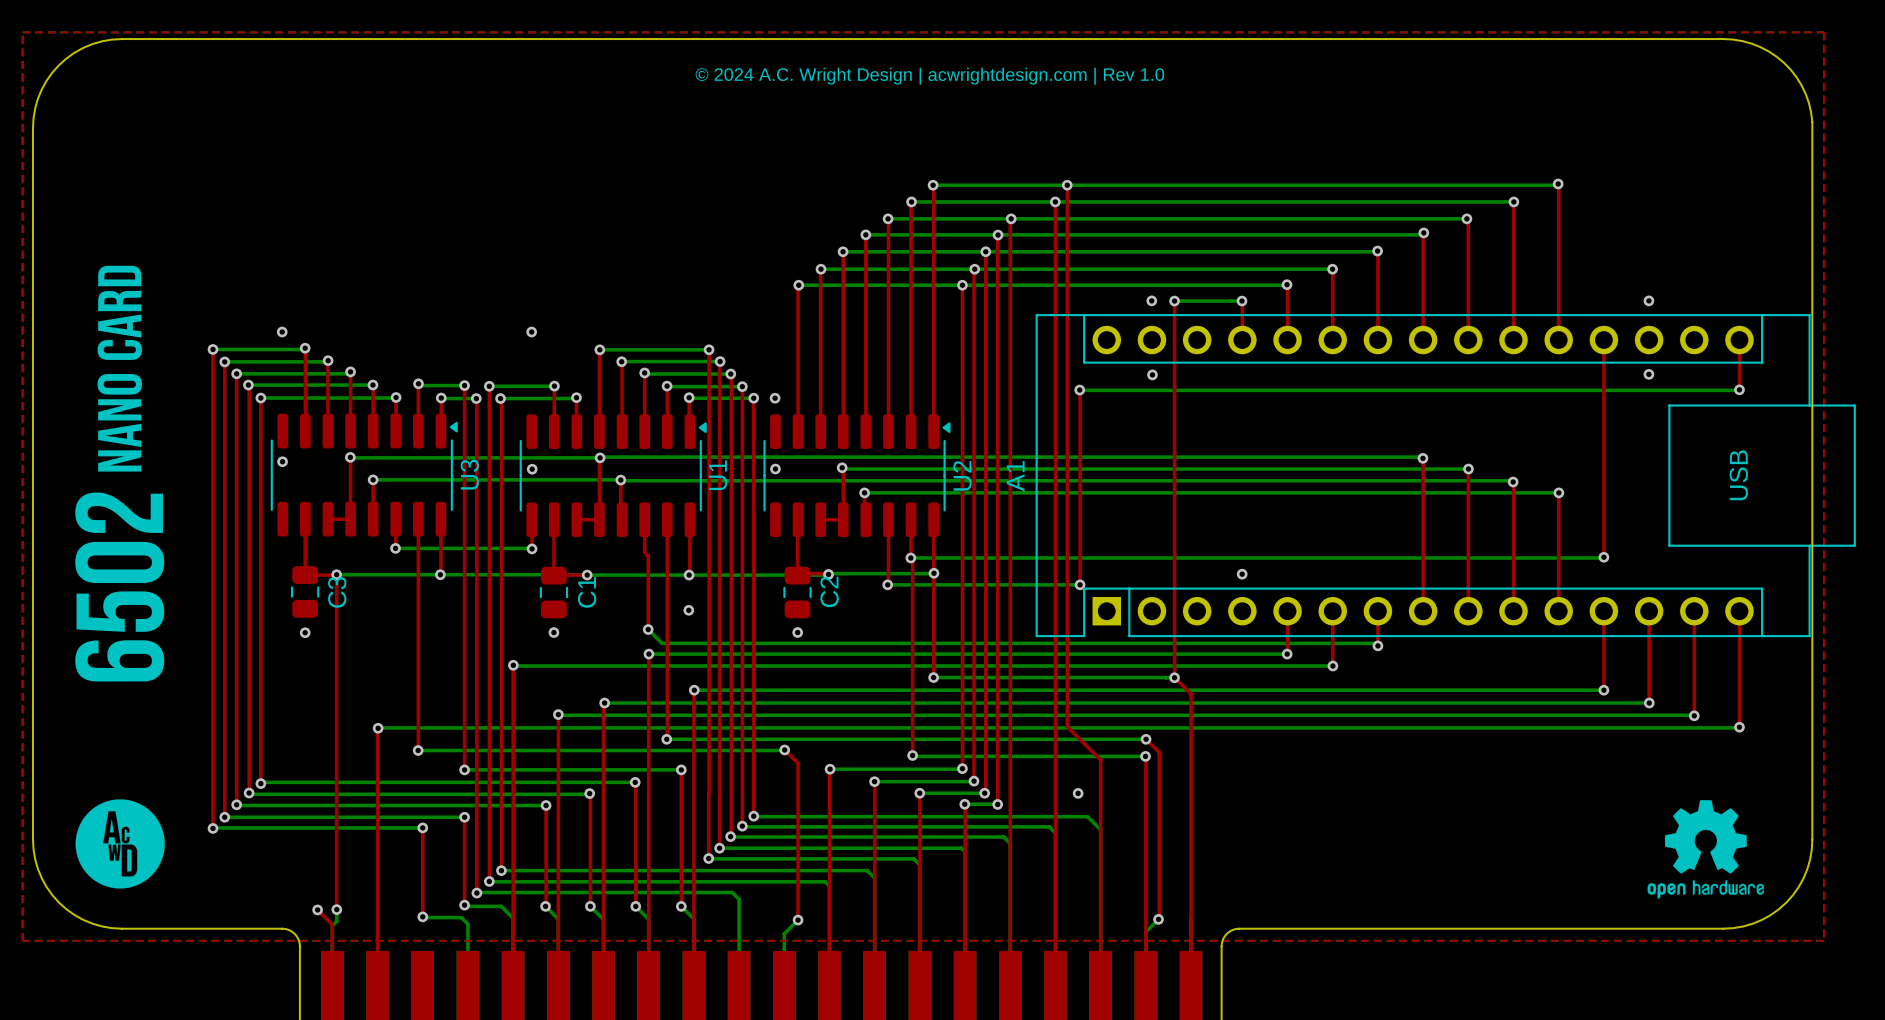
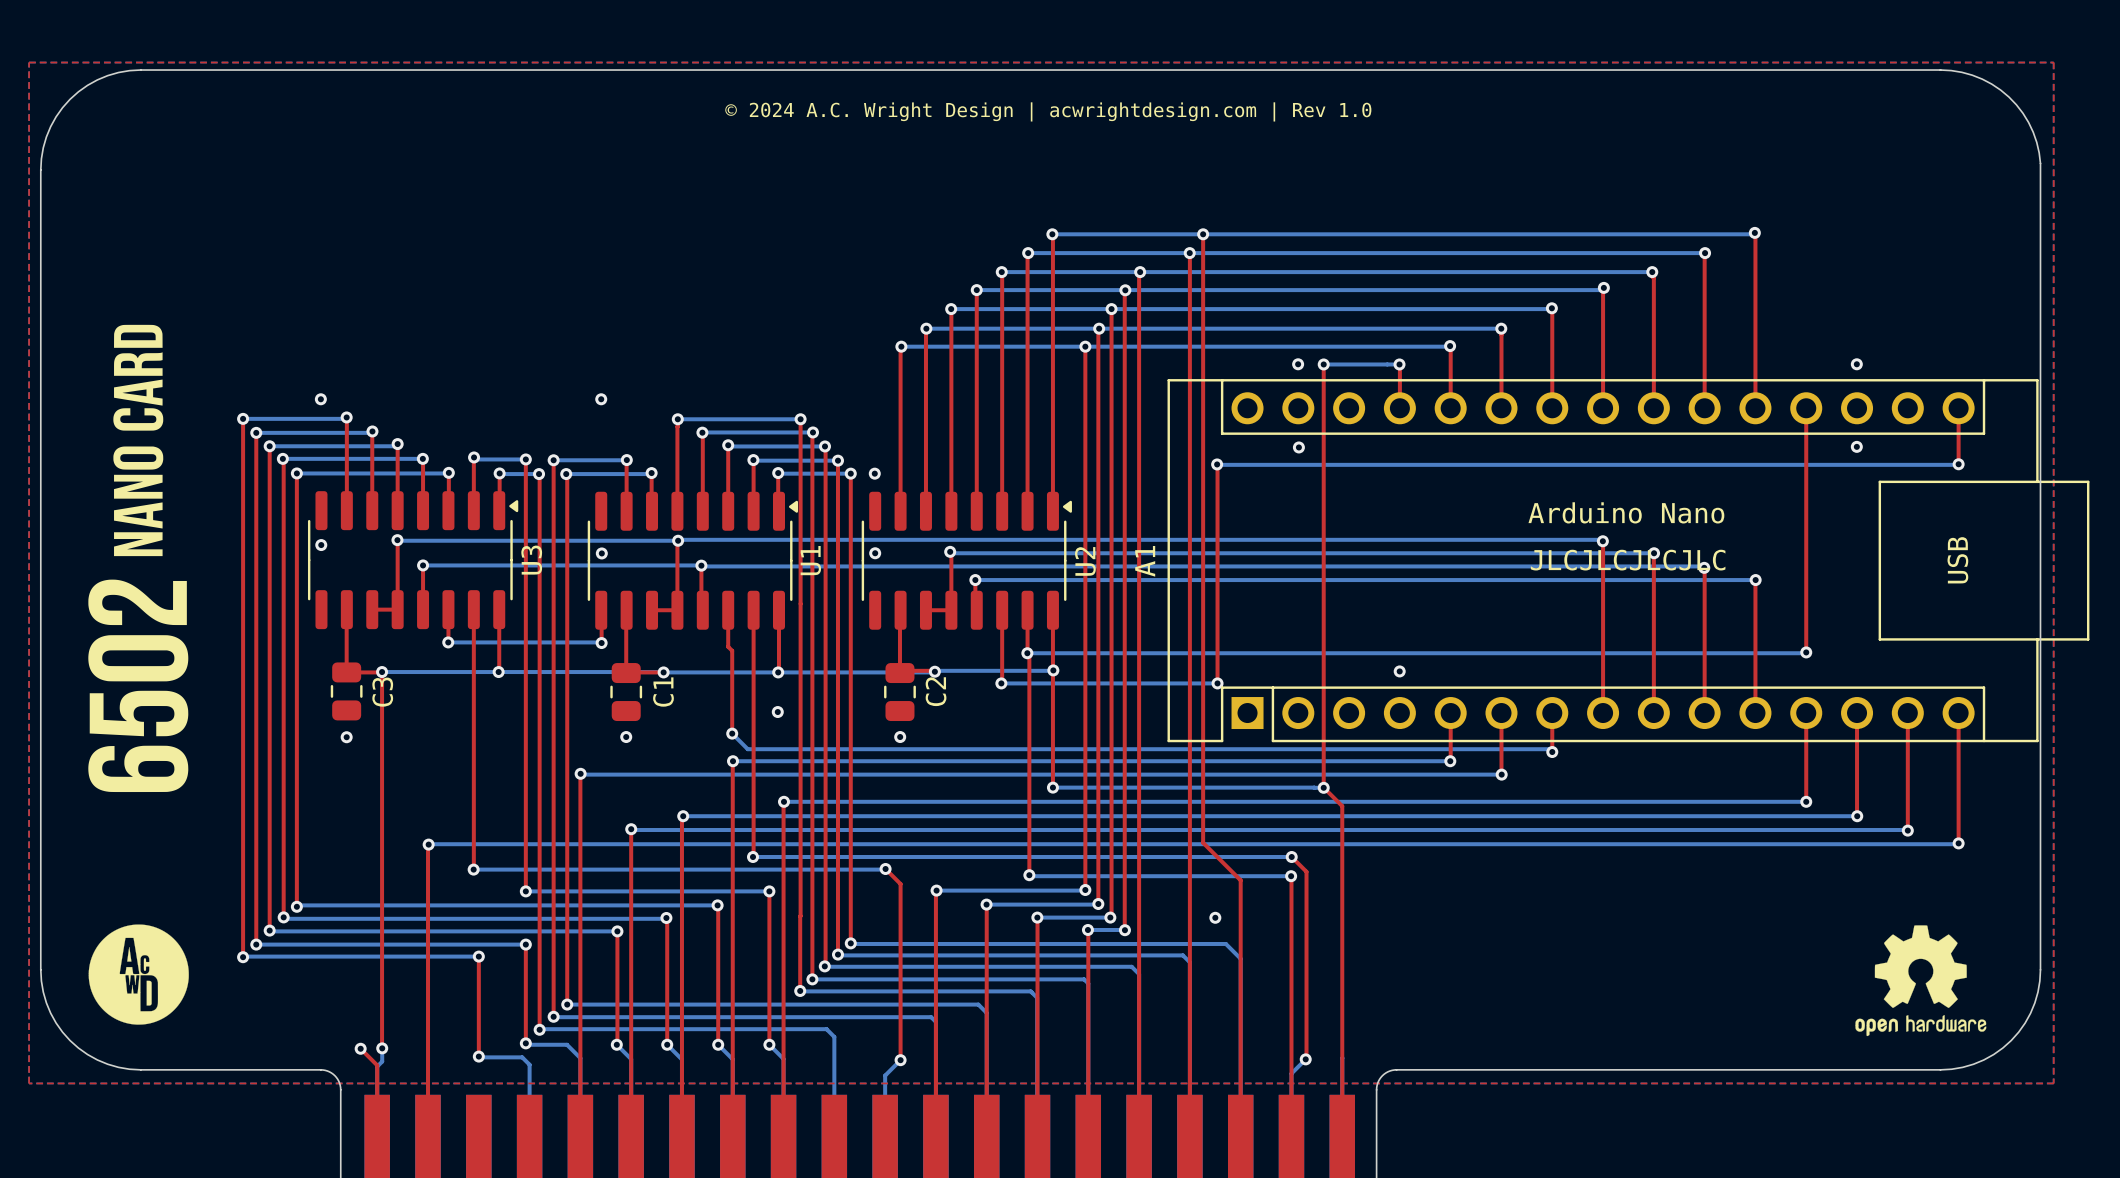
A1 value: none -> Arduino Nano (1626, 512)
text: none -> JLCJLCJLCJLC (1628, 560)

